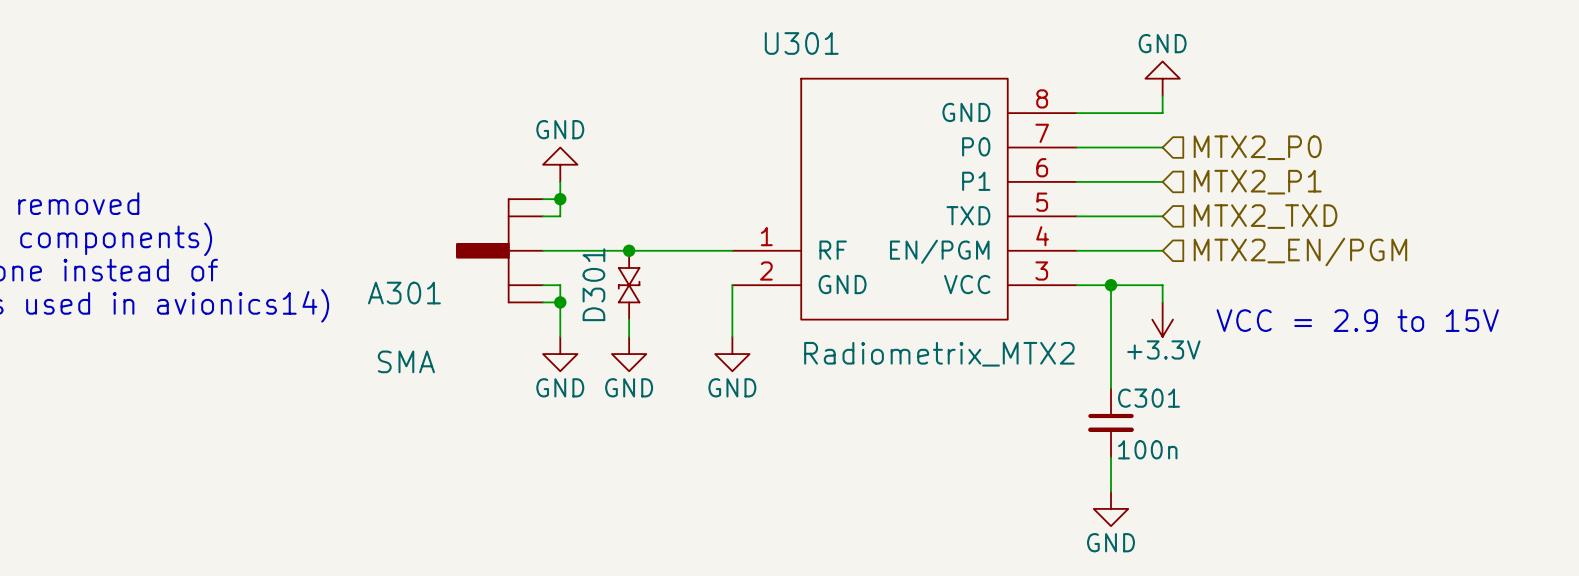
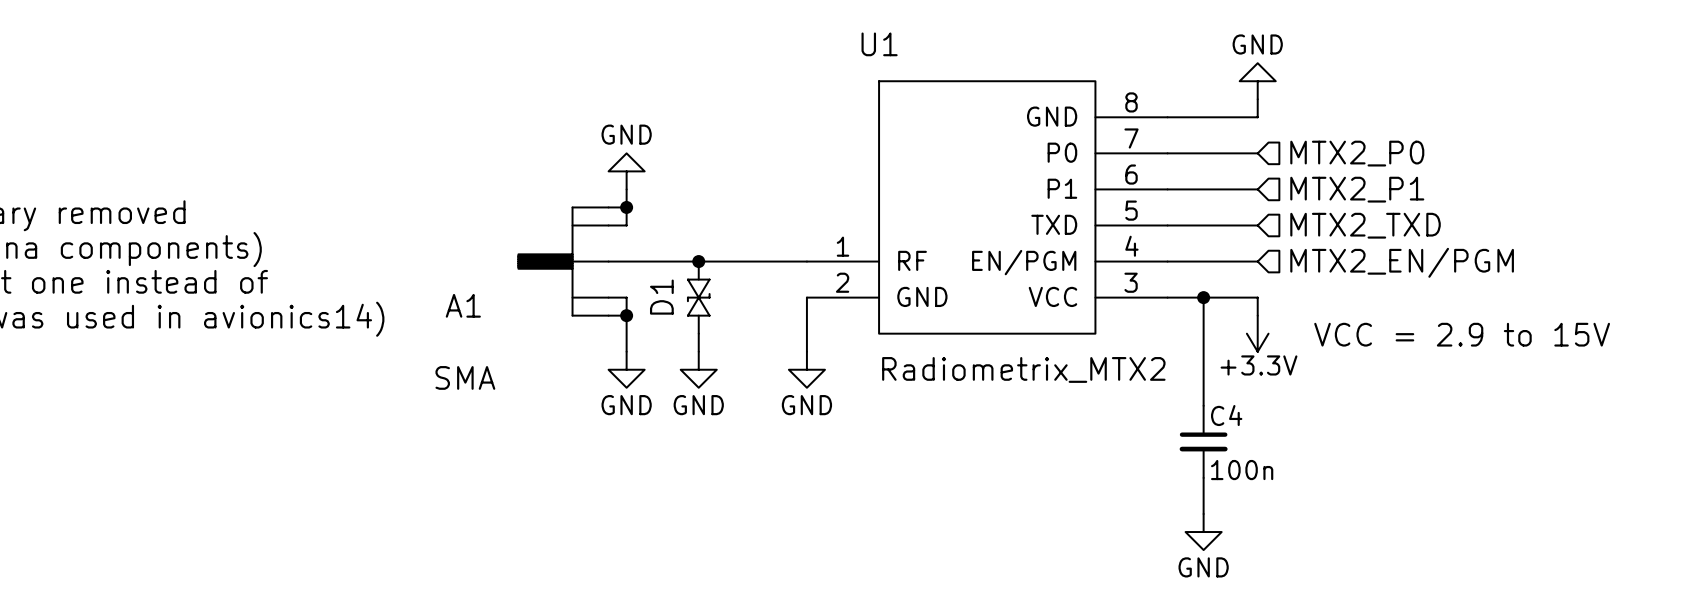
U301 name: U301 (801, 43) -> U1 (879, 44)
D301 name: D301 (593, 284) -> D1 (661, 297)
A301 name: A301 (404, 293) -> A1 (463, 305)
C301 name: C301 (1148, 398) -> C4 (1226, 415)

